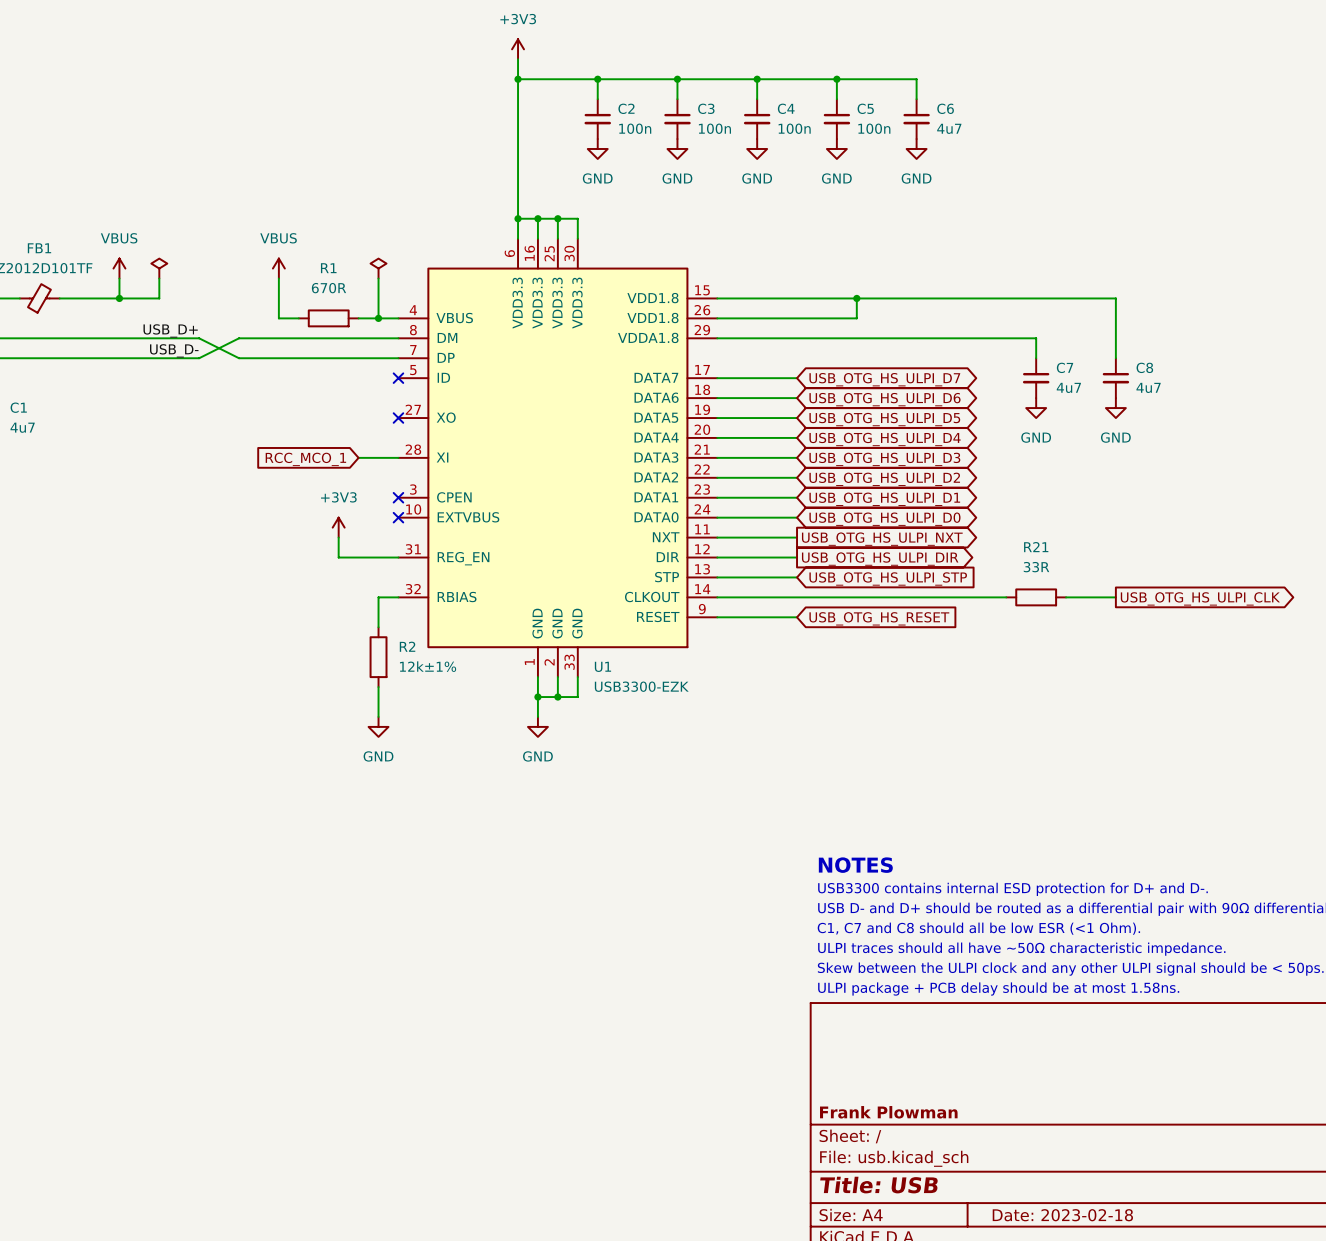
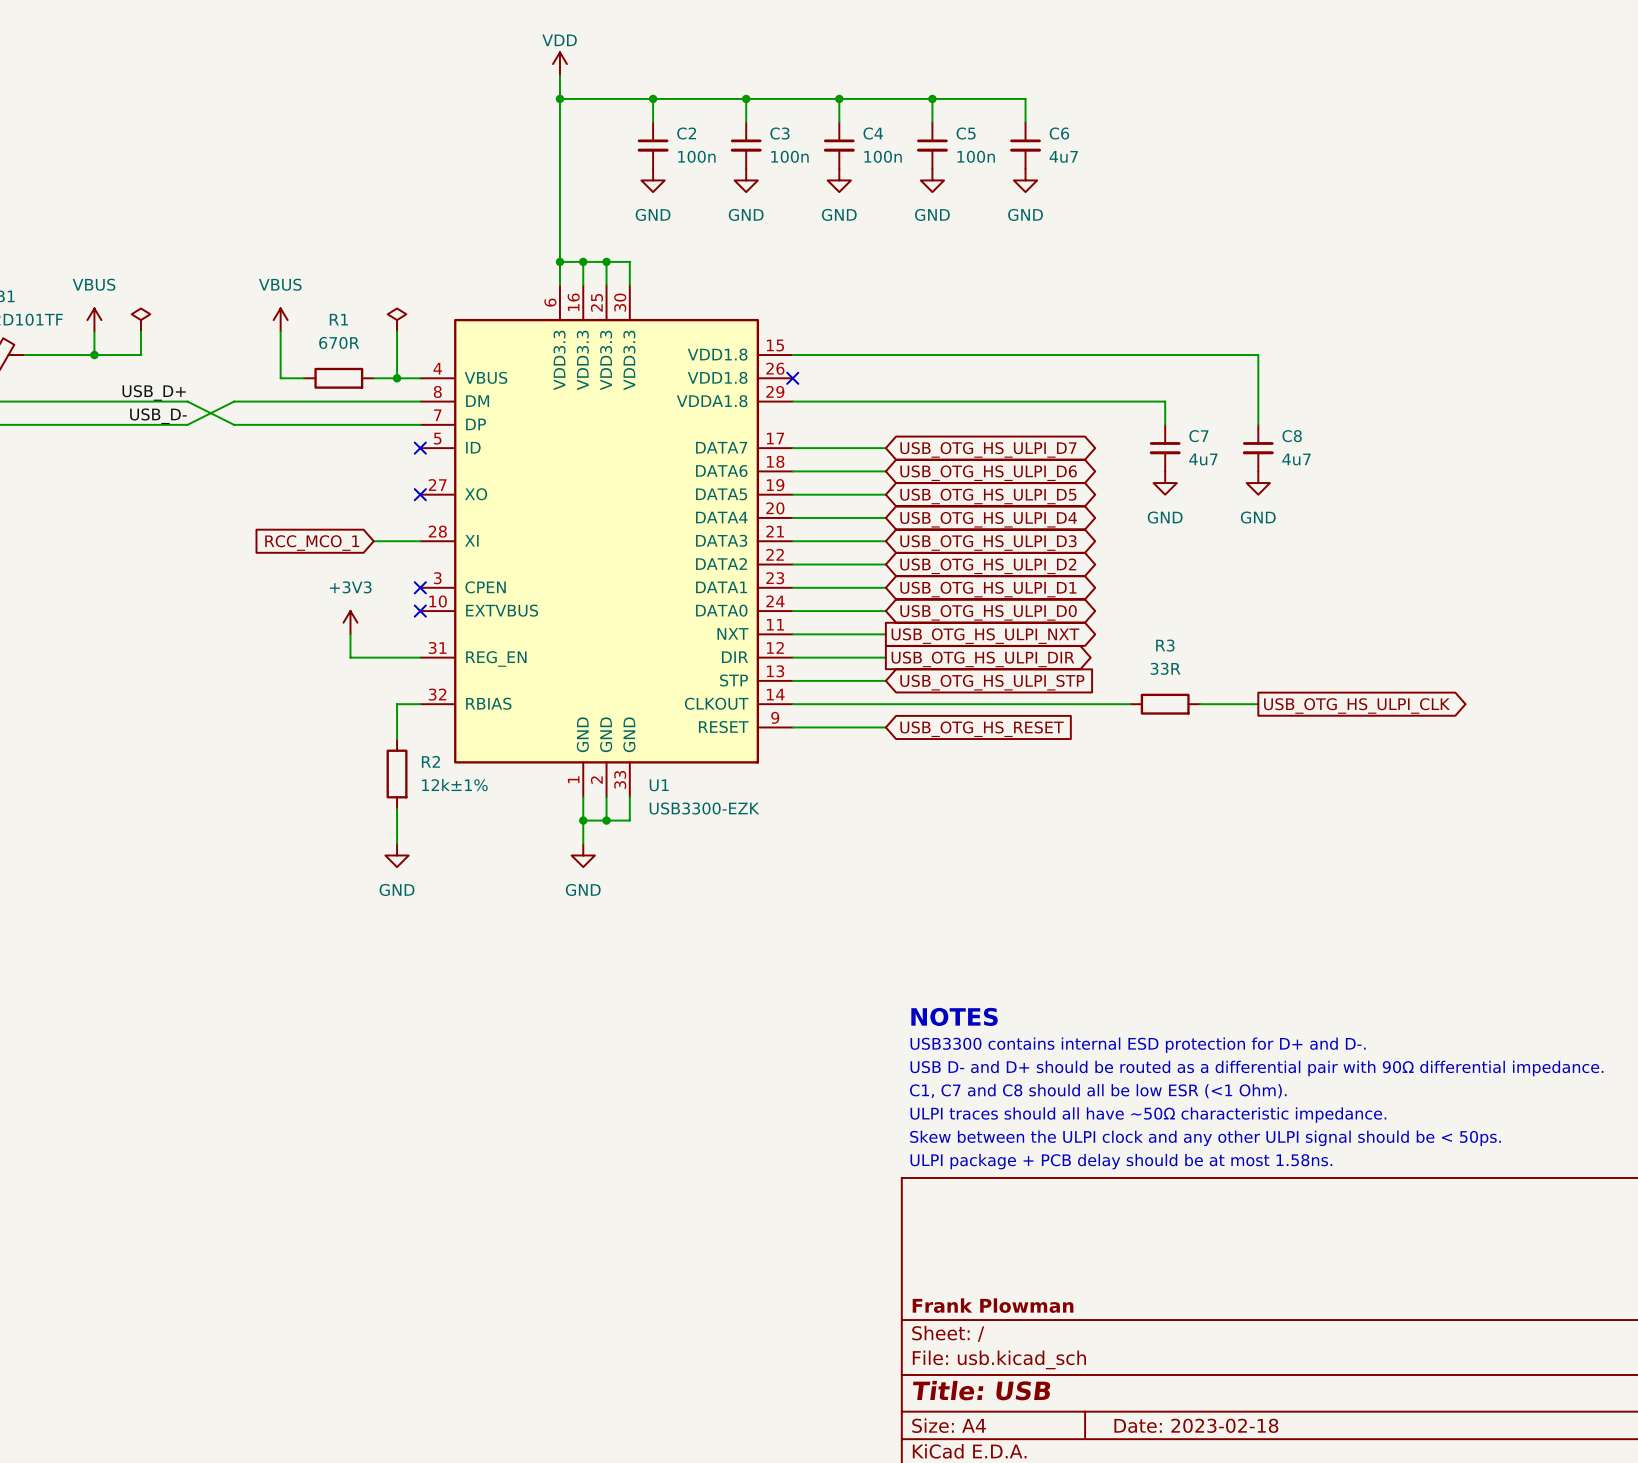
power symbol: +3V3 (518, 49) -> VDD (559, 64)
wire: (856, 298) (856, 318) (717, 318) -> none
junction: (856, 298) -> none
no-connect mark: none -> (792, 378)
R21 name: R21 (1036, 547) -> R3 (1165, 645)

